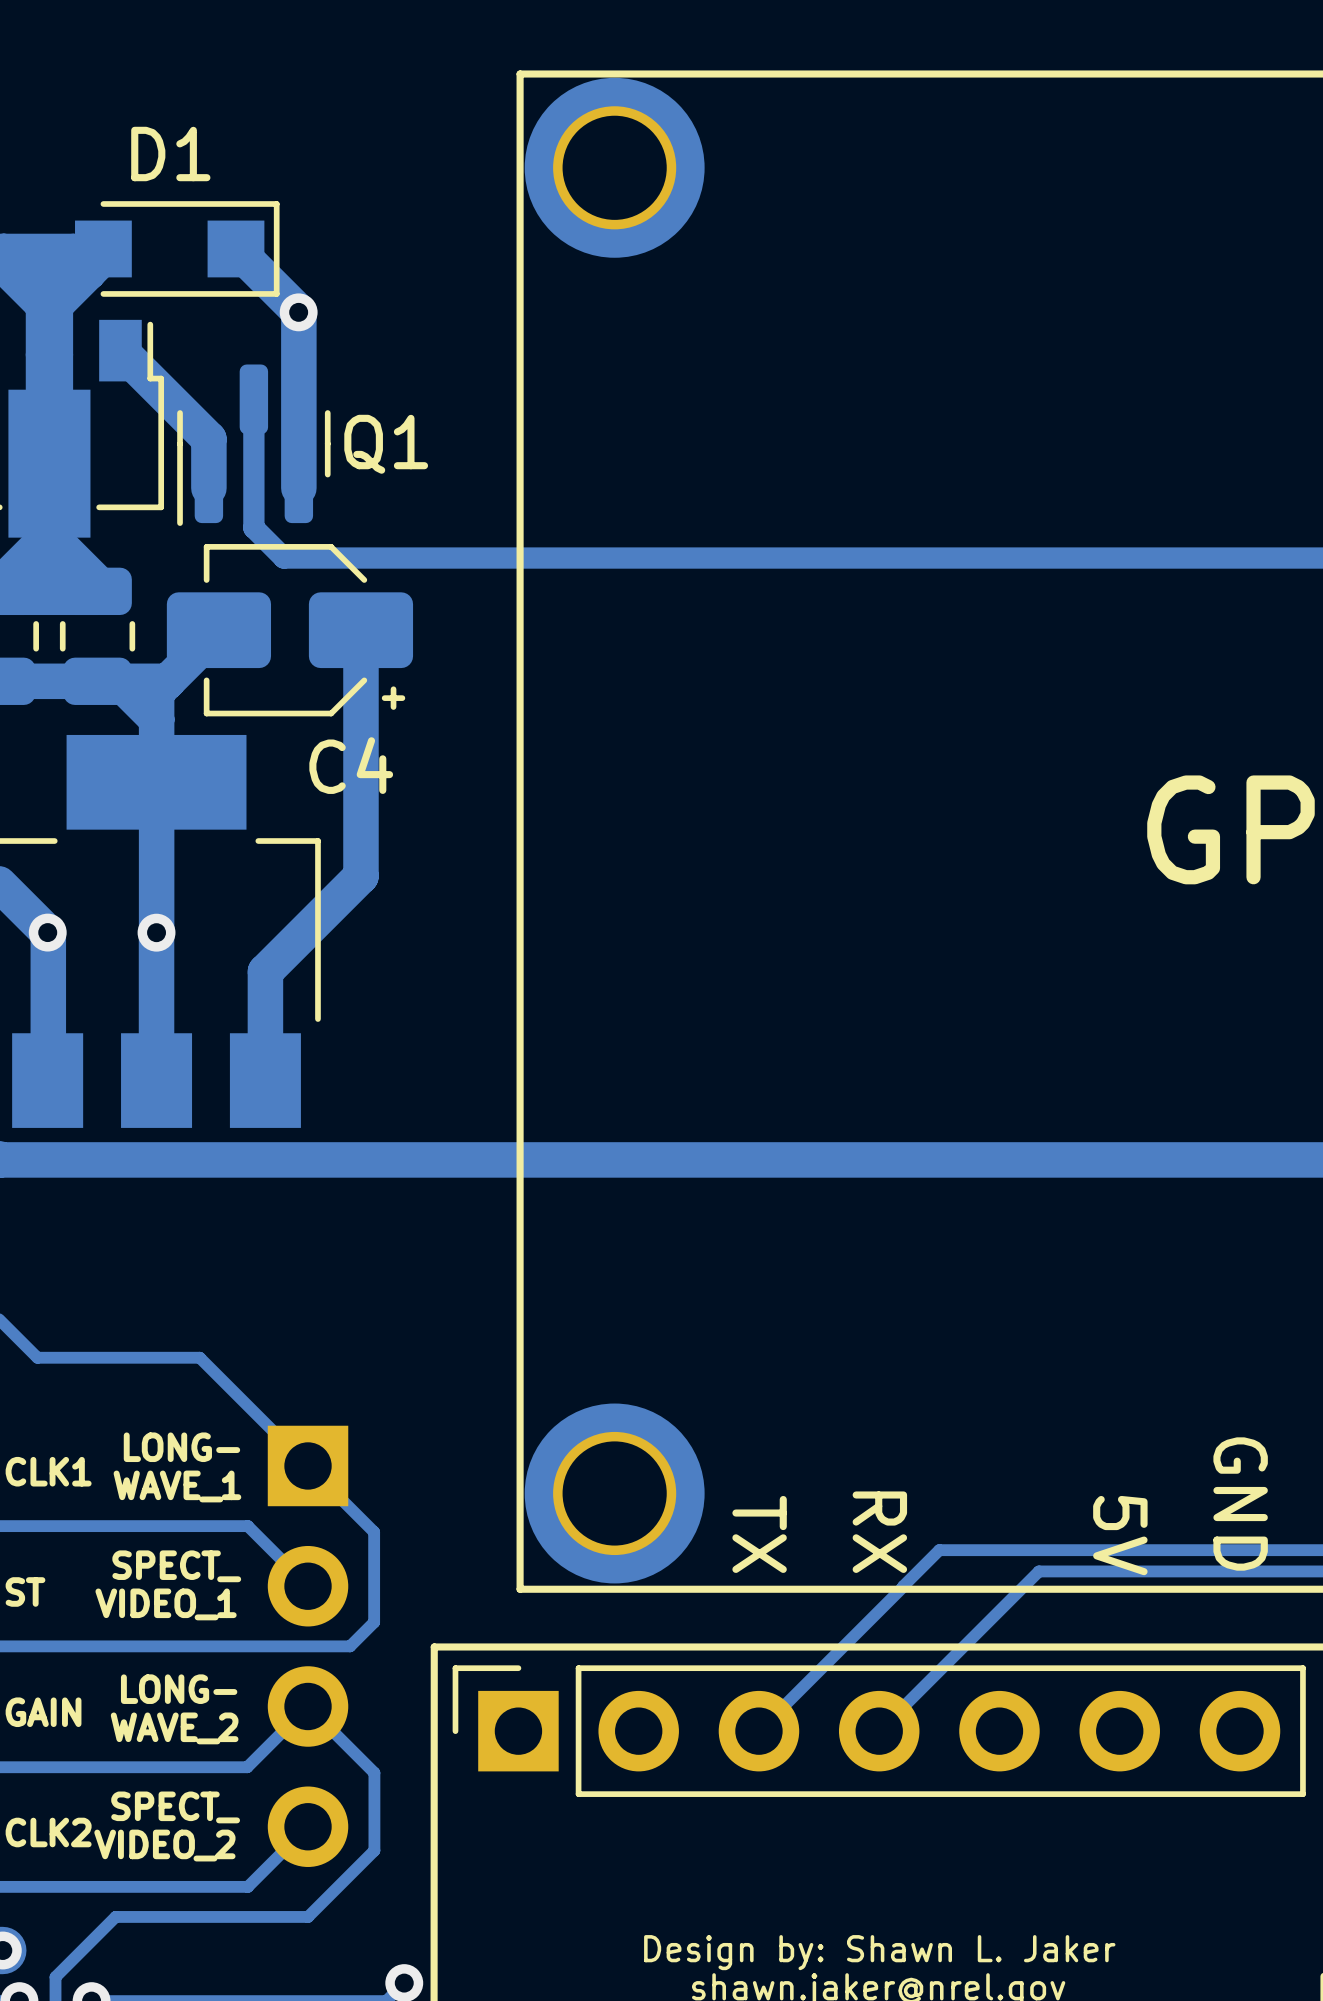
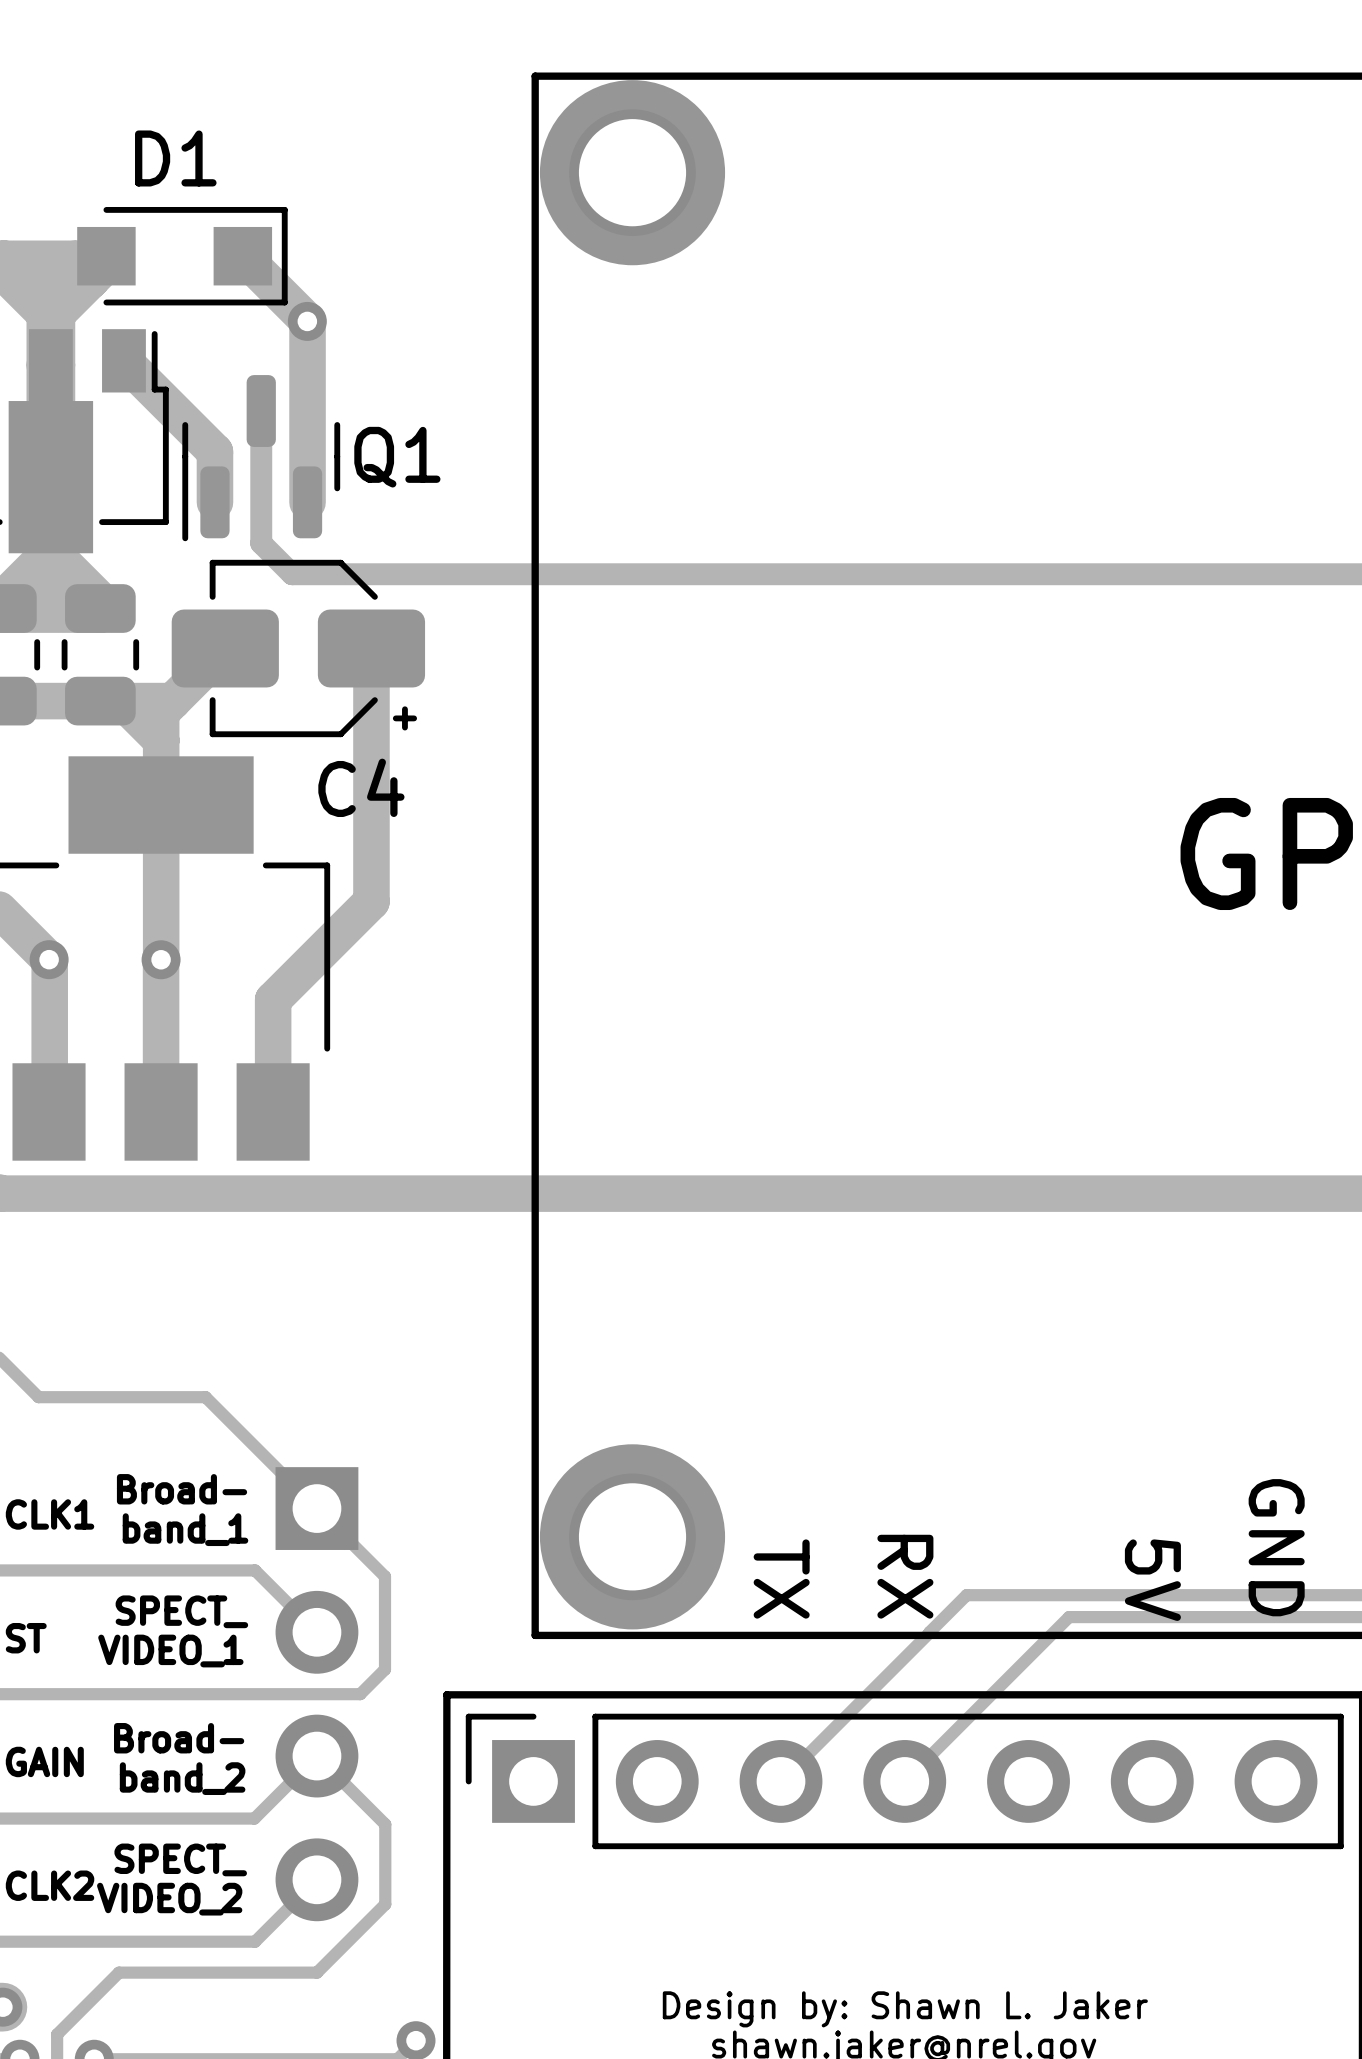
text: LONG- (181, 1447) -> Broad- (182, 1489)
text: WAVE_1 (177, 1486) -> band_1 (185, 1529)
text: LONG- (179, 1689) -> Broad- (179, 1738)
text: WAVE_2 (174, 1728) -> band_2 (182, 1778)

